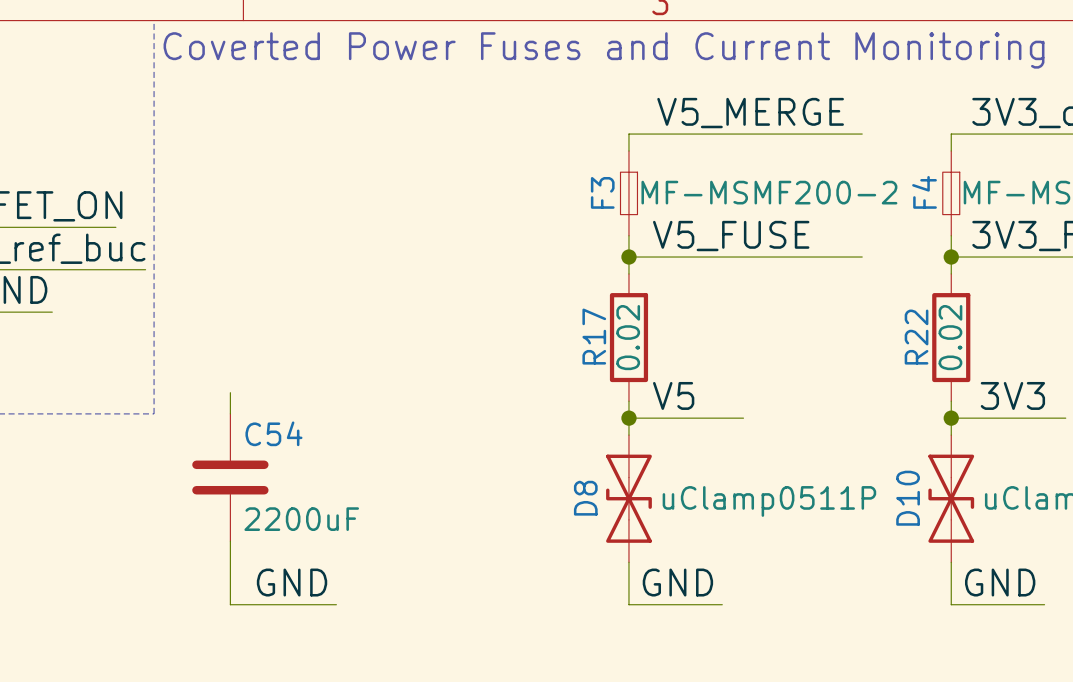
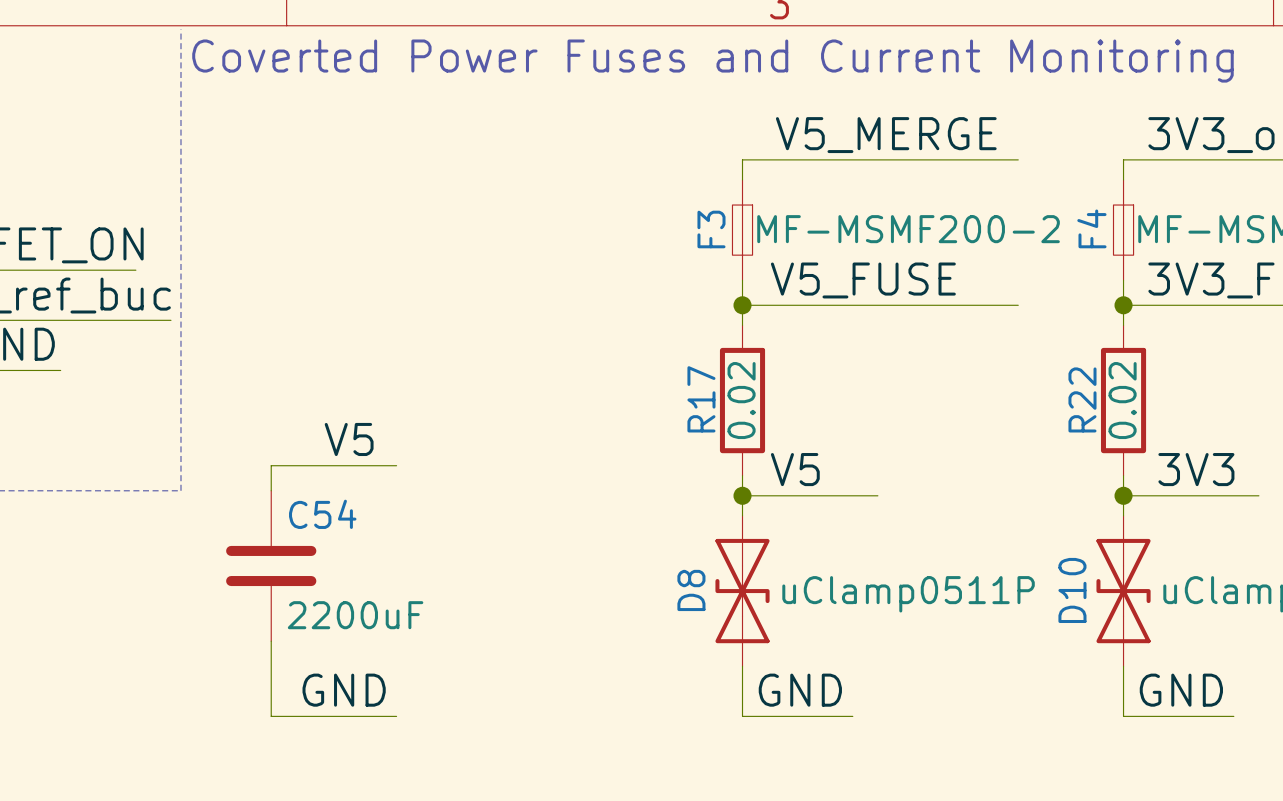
label: none -> V5 (349, 439)
wire: none -> (271, 465) (396, 465)

